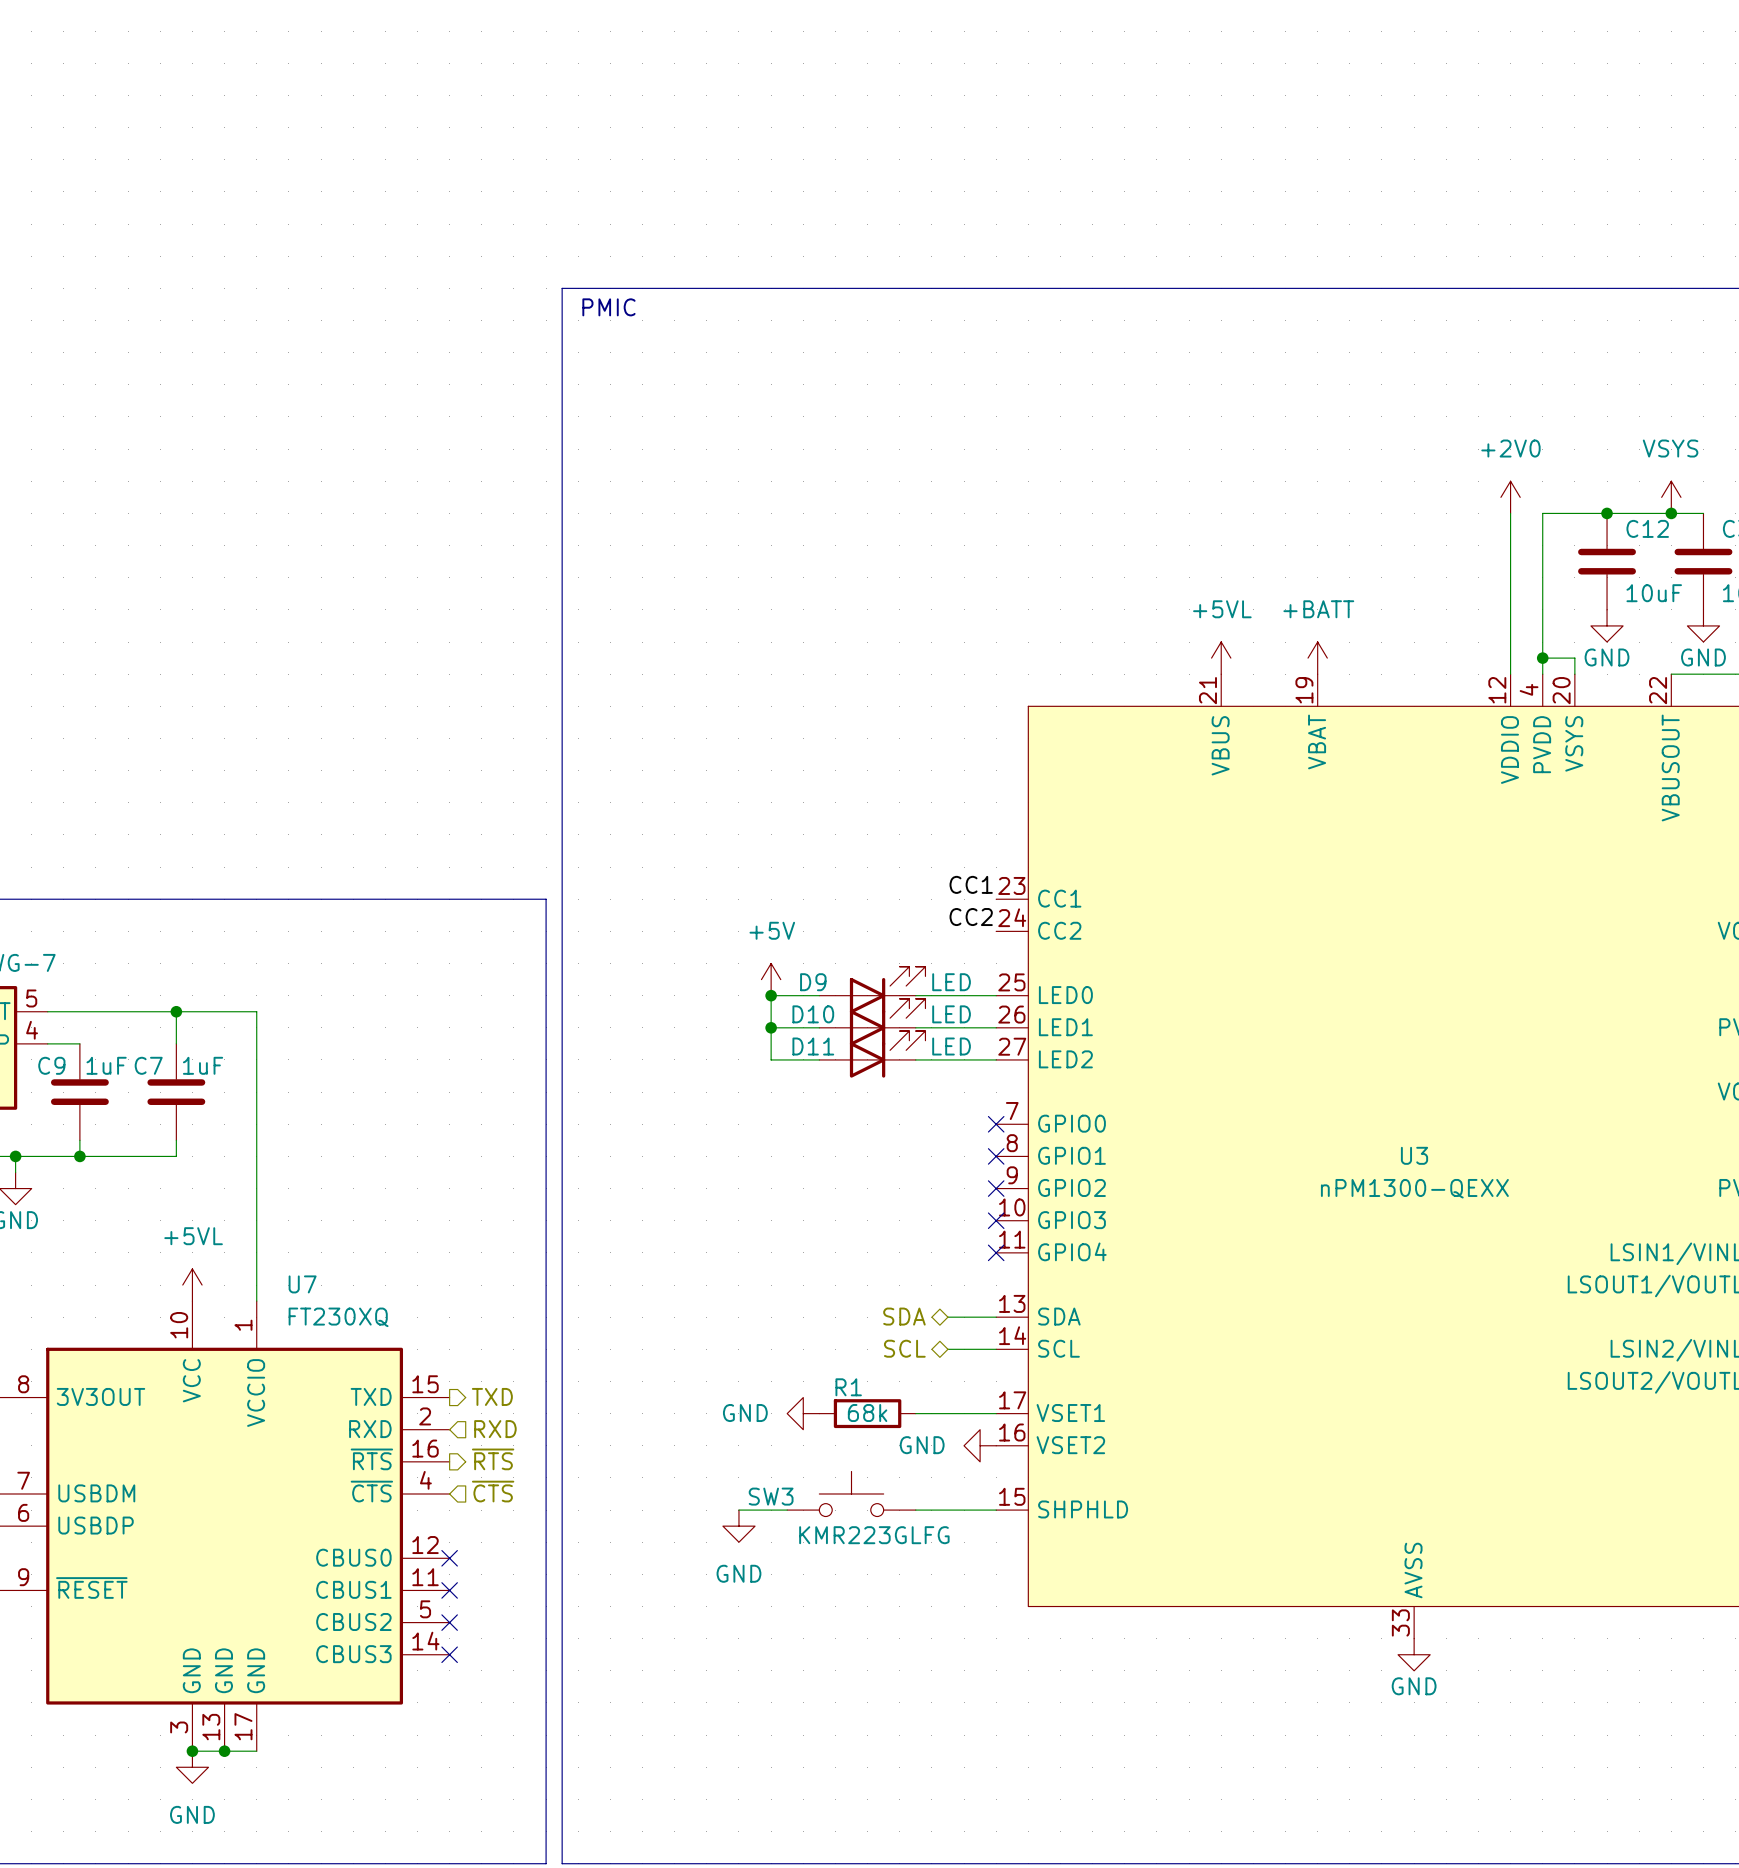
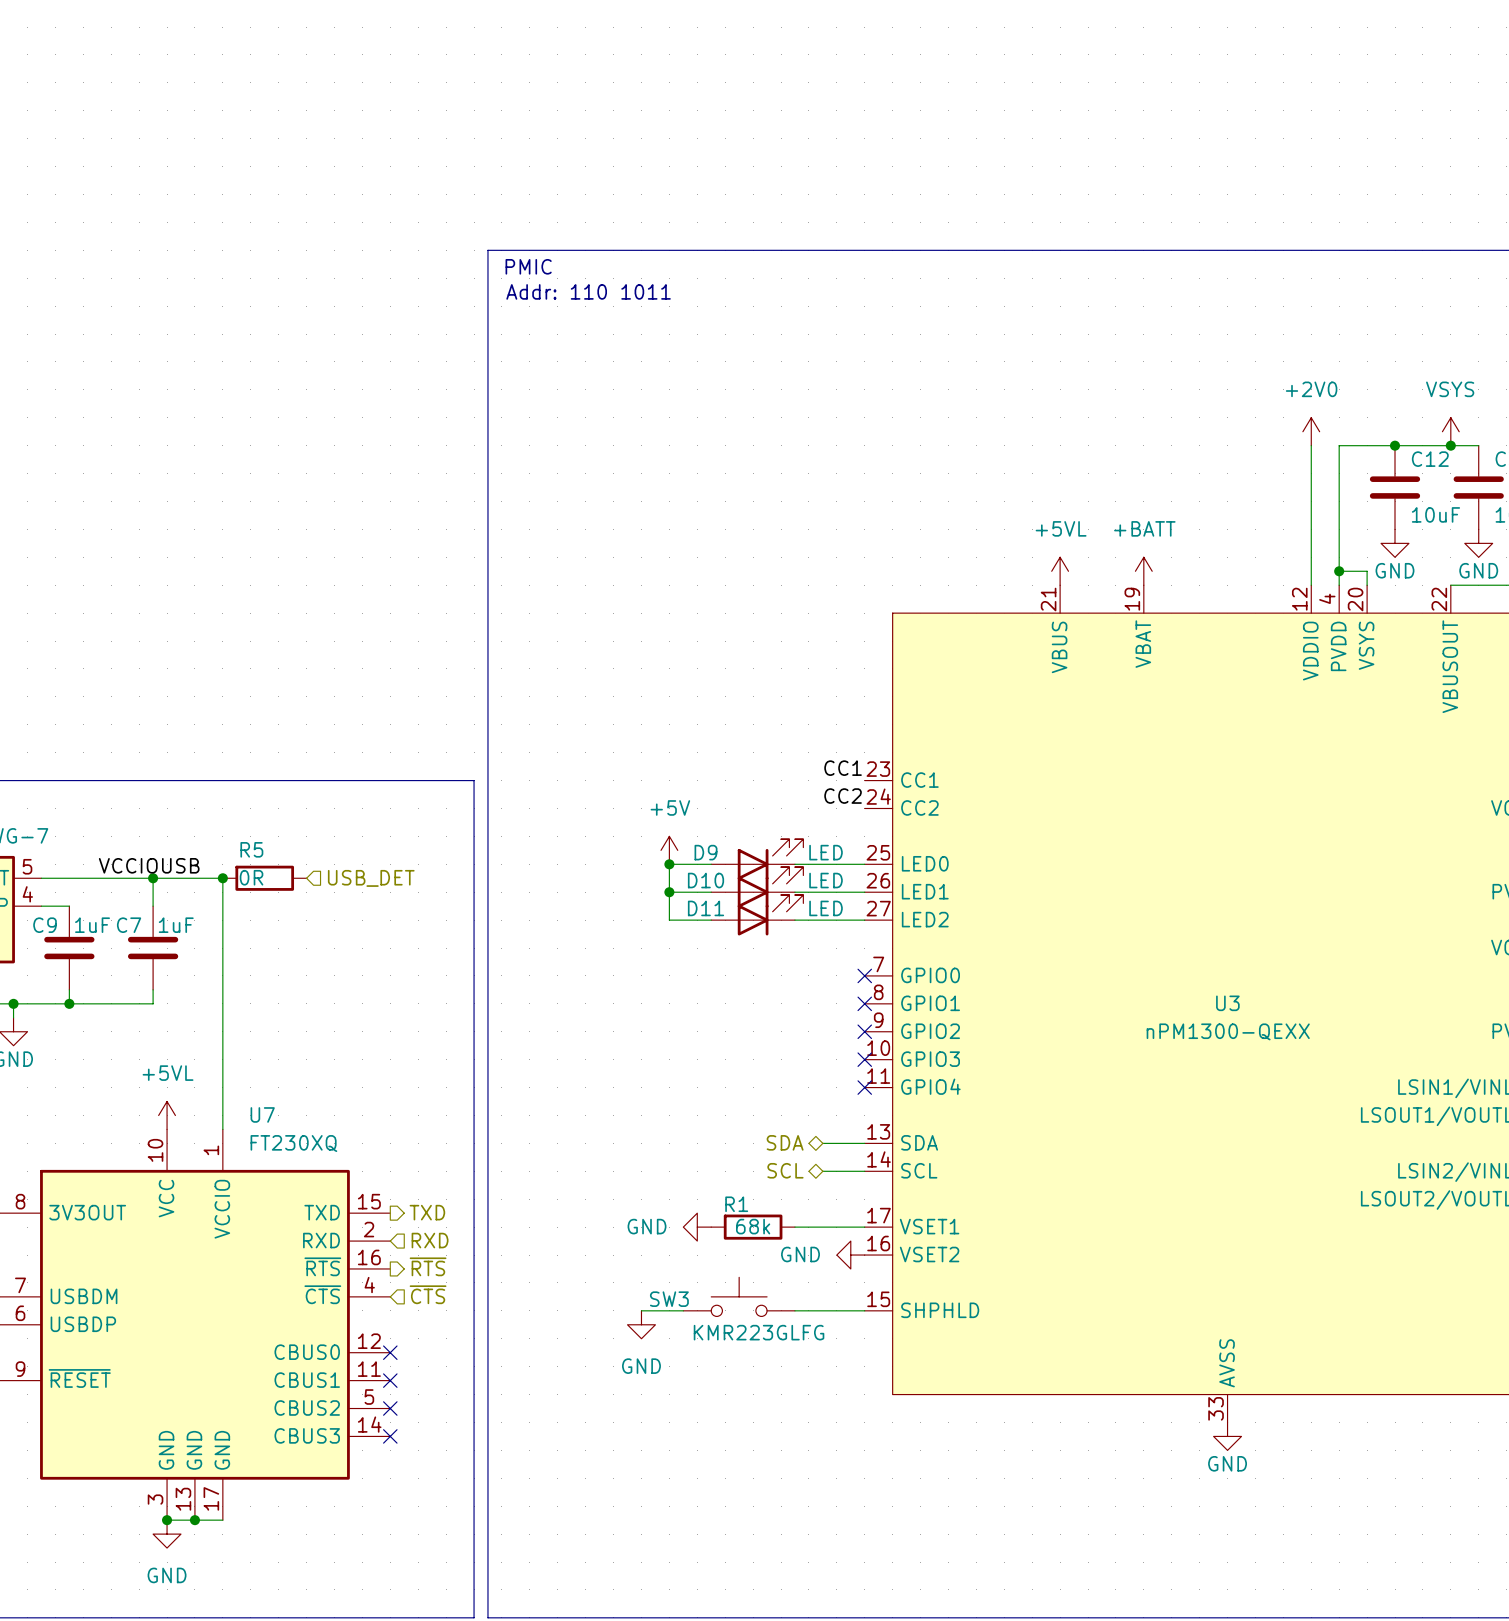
text: none -> Addr: 110 1011 (588, 291)
label: none -> VCCIOUSB (149, 865)
junction: none -> (222, 878)
R5: none -> 0R (264, 878)
hierarchical label: none -> USB_DET (371, 878)

